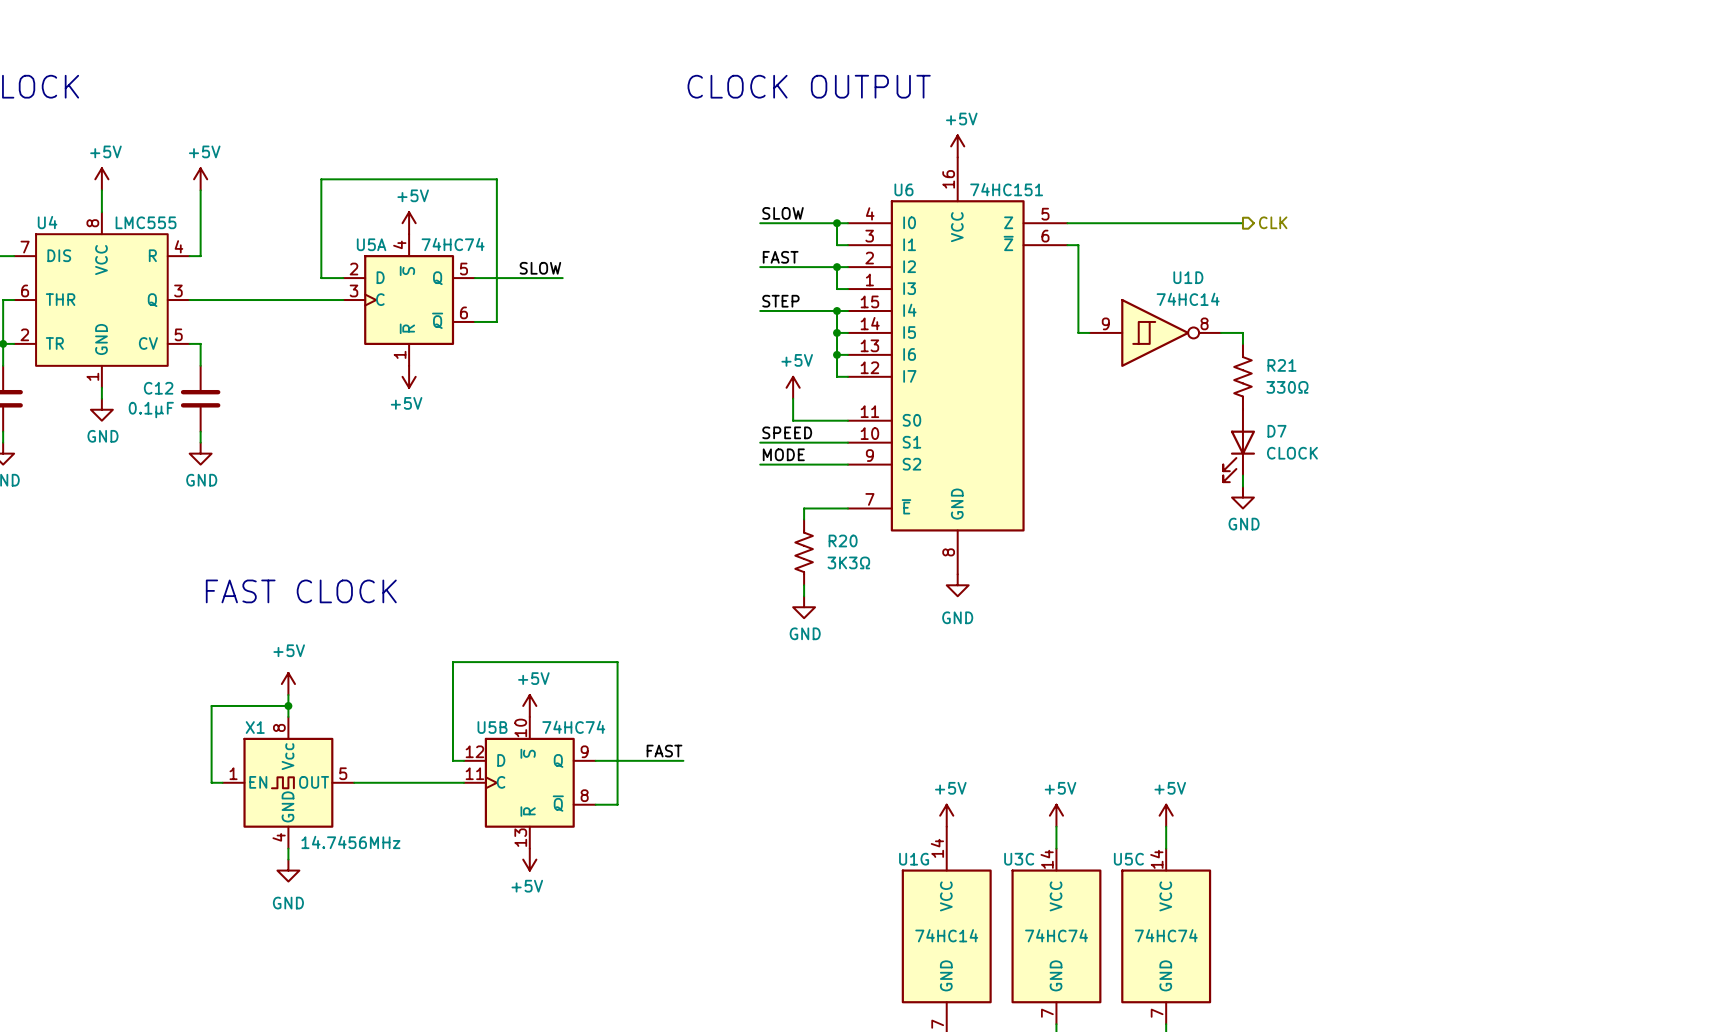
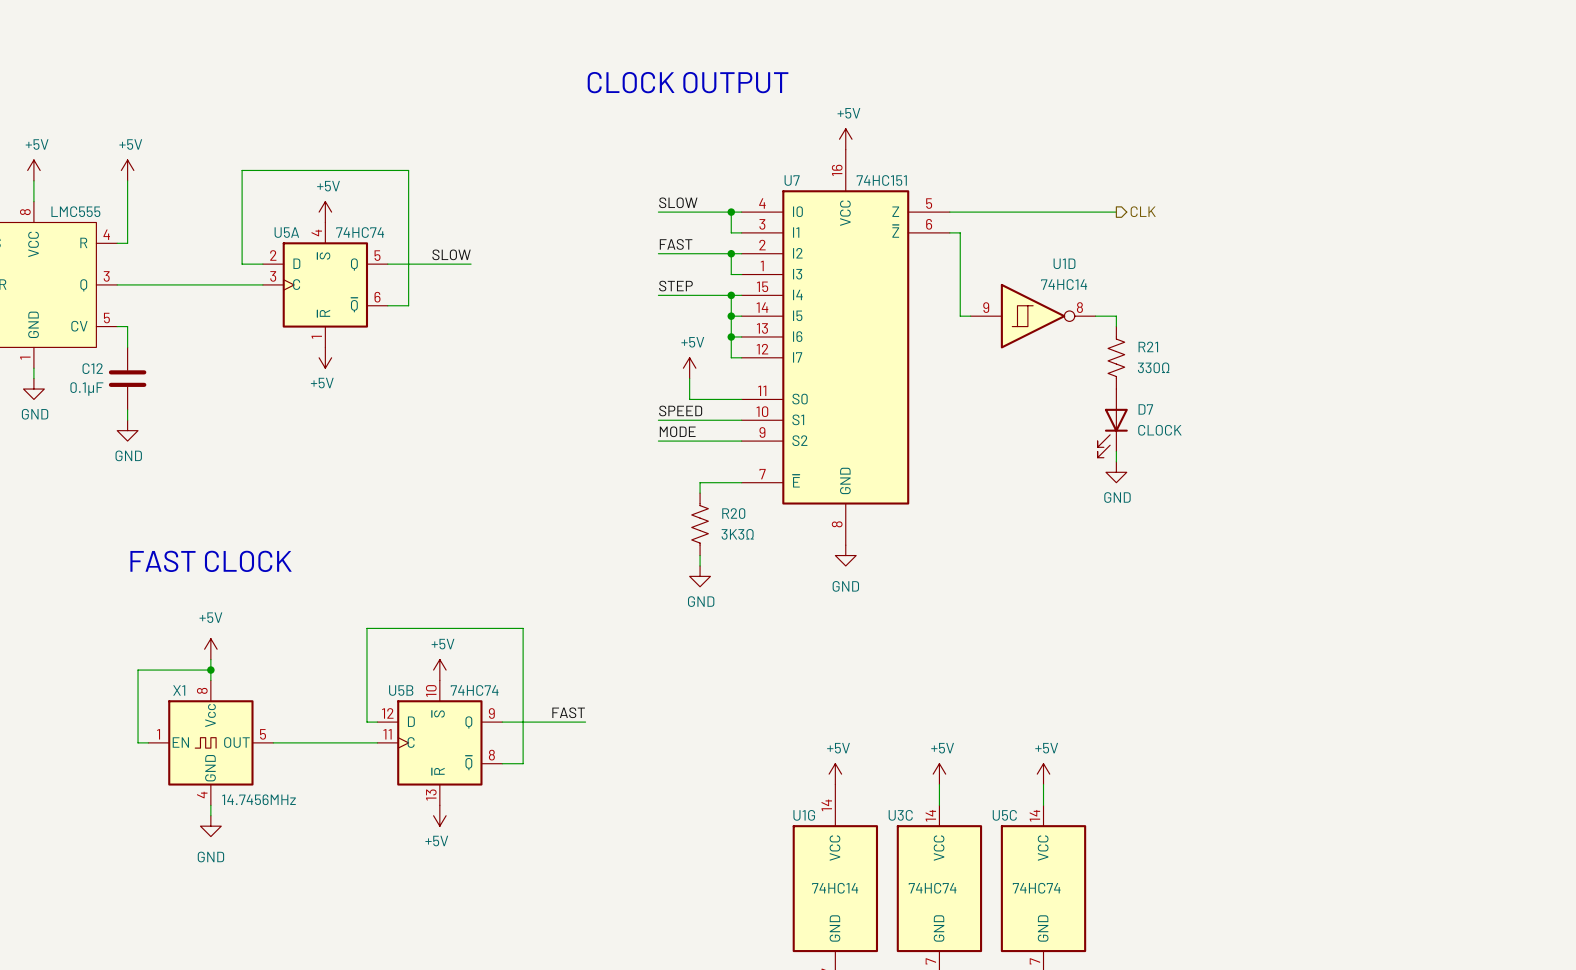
U6 name: U6 (903, 189) -> U7 (792, 180)

